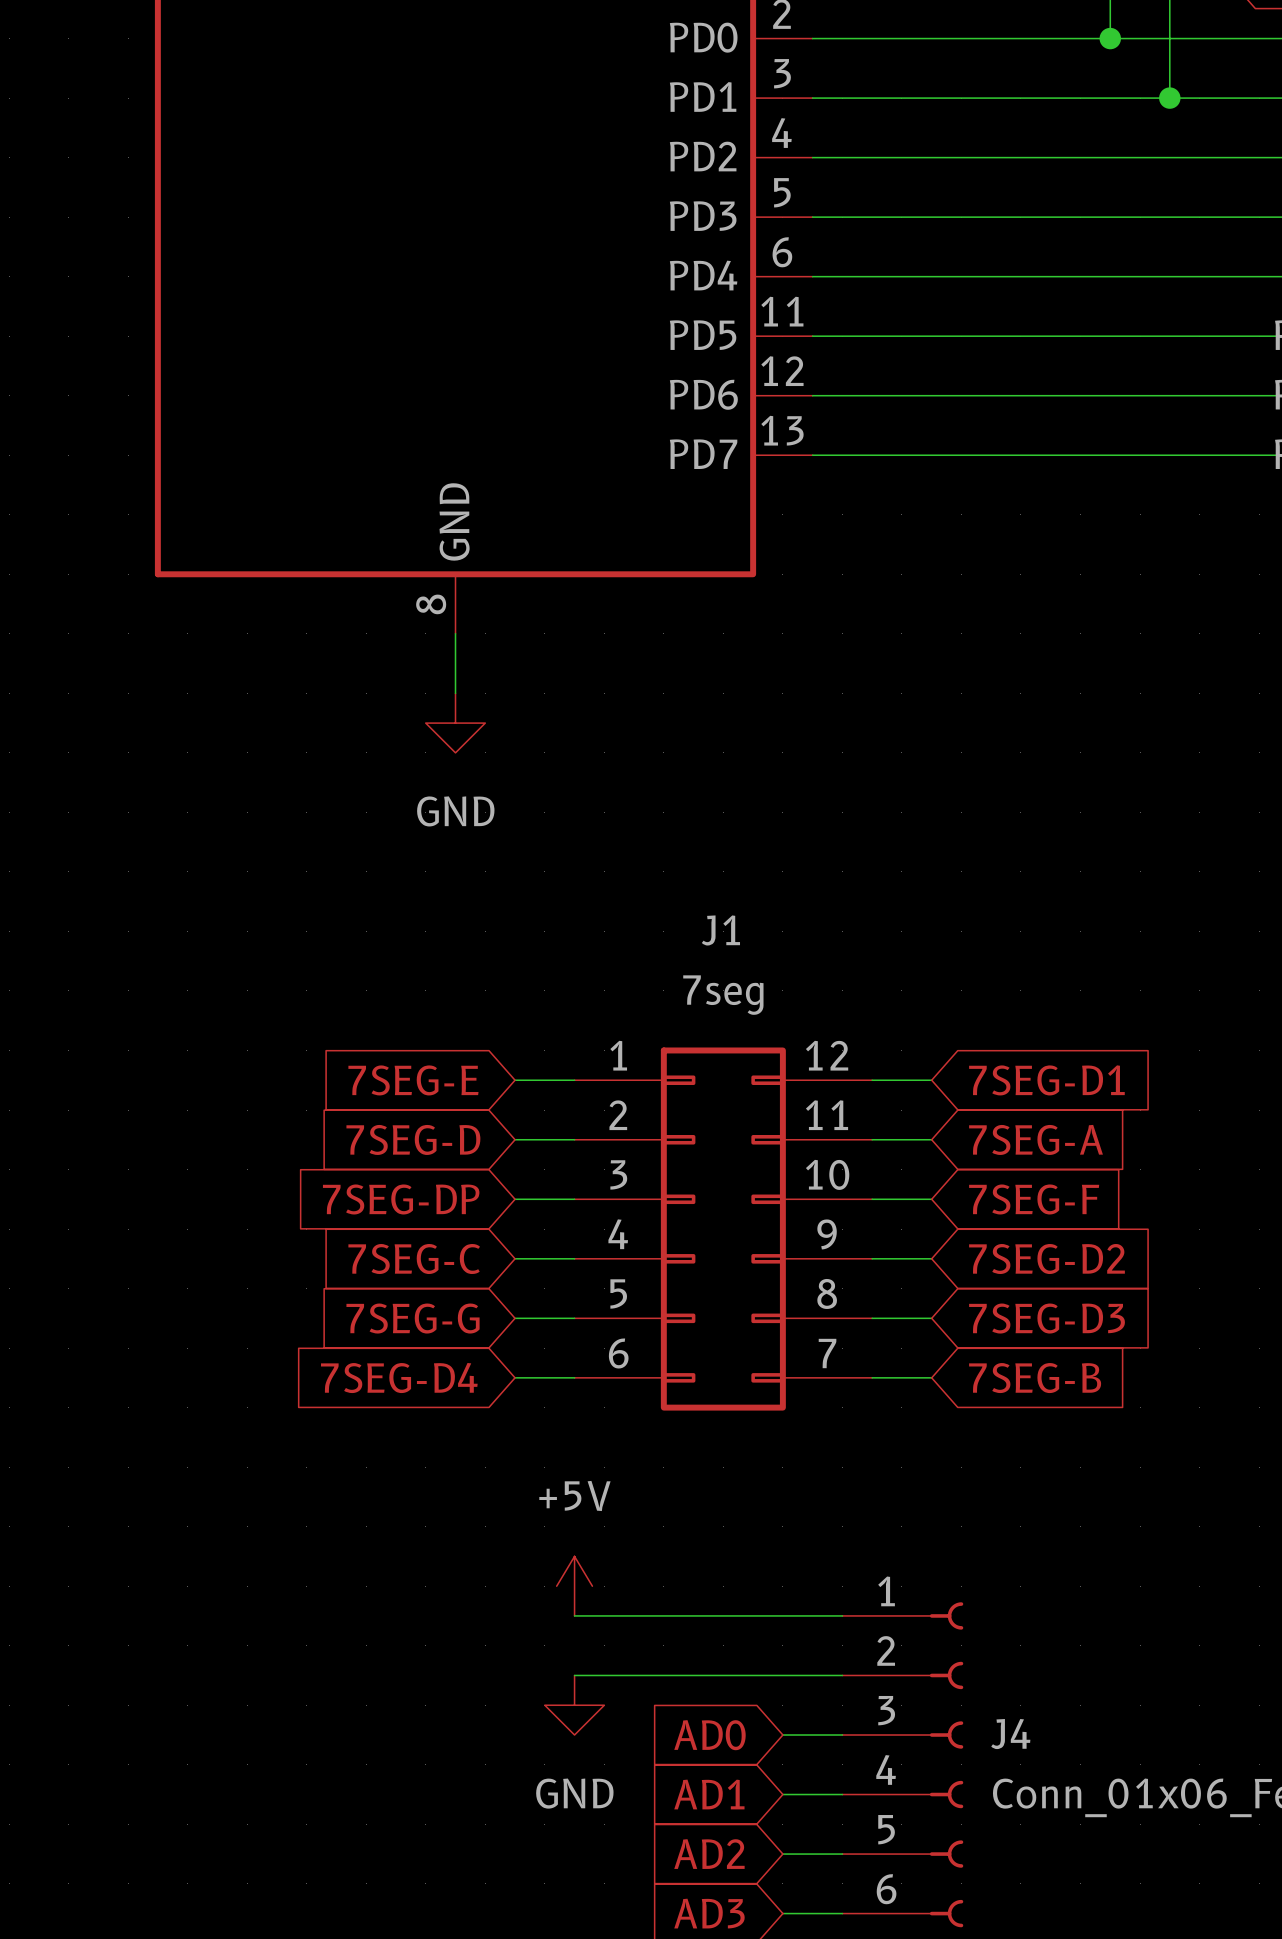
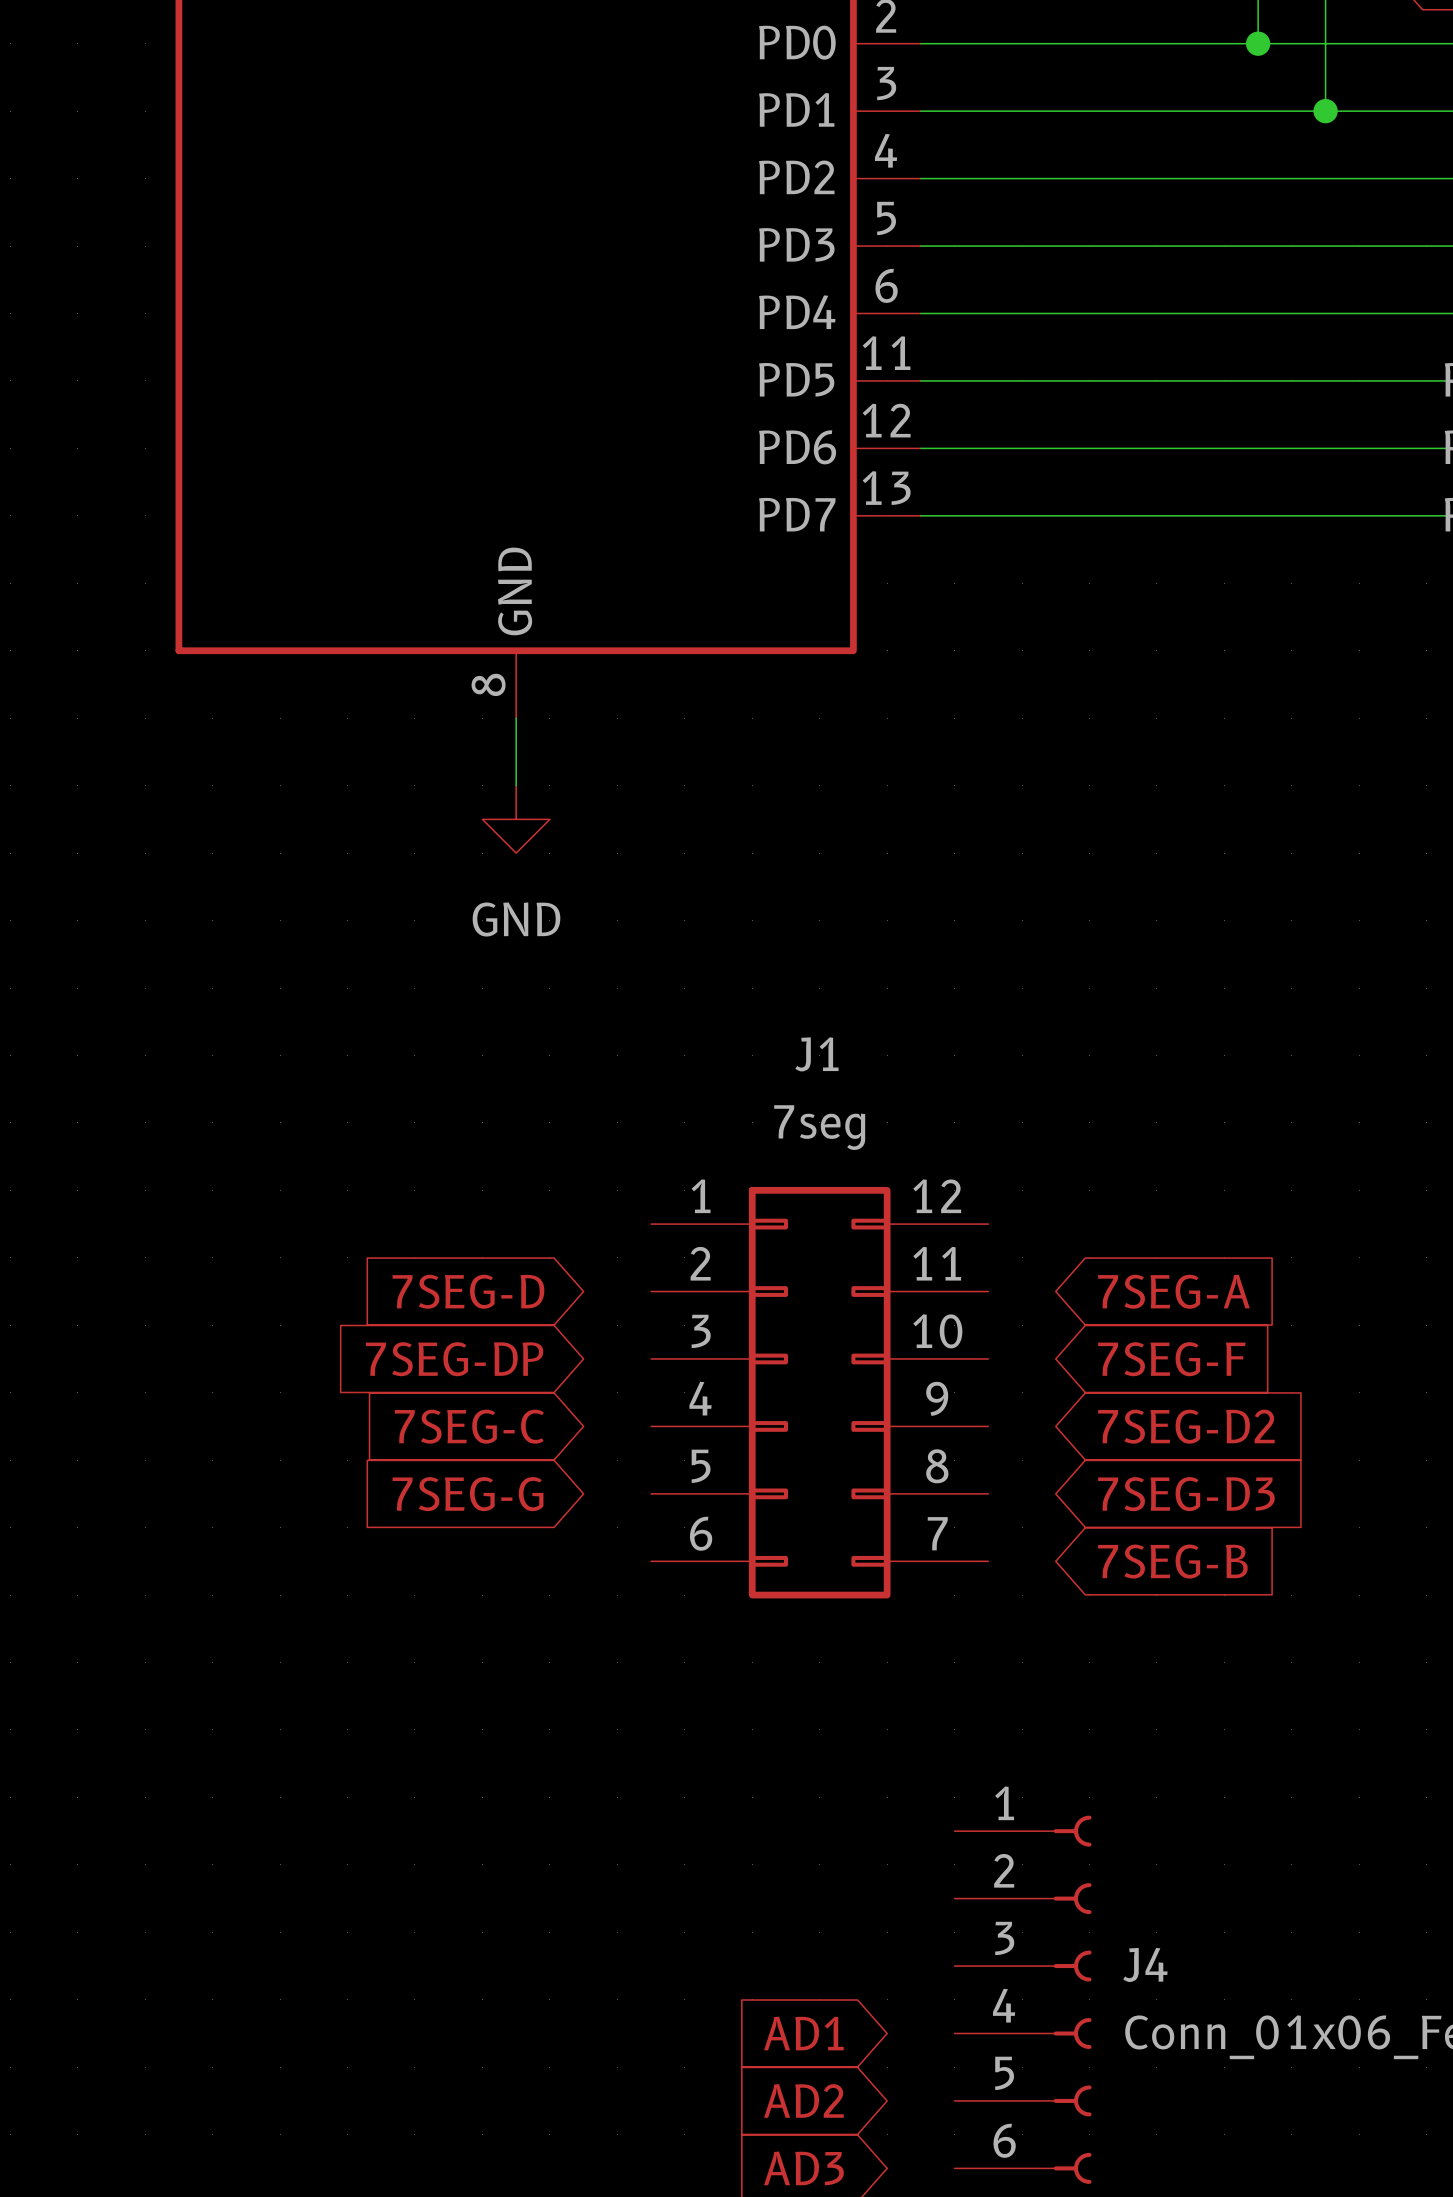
global label: 7SEG-E (413, 1080) -> none
wire: (515, 1080) (574, 1080) -> none
wire: (872, 1080) (931, 1080) -> none
global label: 7SEG-D1 (1046, 1080) -> none
wire: (515, 1139) (574, 1139) -> none
wire: (872, 1139) (931, 1139) -> none
wire: (515, 1199) (574, 1199) -> none
wire: (872, 1199) (931, 1199) -> none
wire: (515, 1258) (574, 1258) -> none
wire: (872, 1258) (931, 1258) -> none
wire: (515, 1318) (574, 1318) -> none
wire: (872, 1318) (931, 1318) -> none
wire: (515, 1377) (574, 1377) -> none
wire: (872, 1377) (931, 1377) -> none
global label: 7SEG-D4 (399, 1378) -> none
power symbol: +5V (574, 1586) -> none
wire: (574, 1615) (842, 1615) -> none
wire: (574, 1675) (842, 1675) -> none
power symbol: GND (574, 1705) -> none
global label: AD0 (709, 1735) -> none
wire: (782, 1735) (842, 1735) -> none
wire: (782, 1794) (842, 1794) -> none
wire: (782, 1854) (842, 1854) -> none
wire: (782, 1913) (842, 1913) -> none

